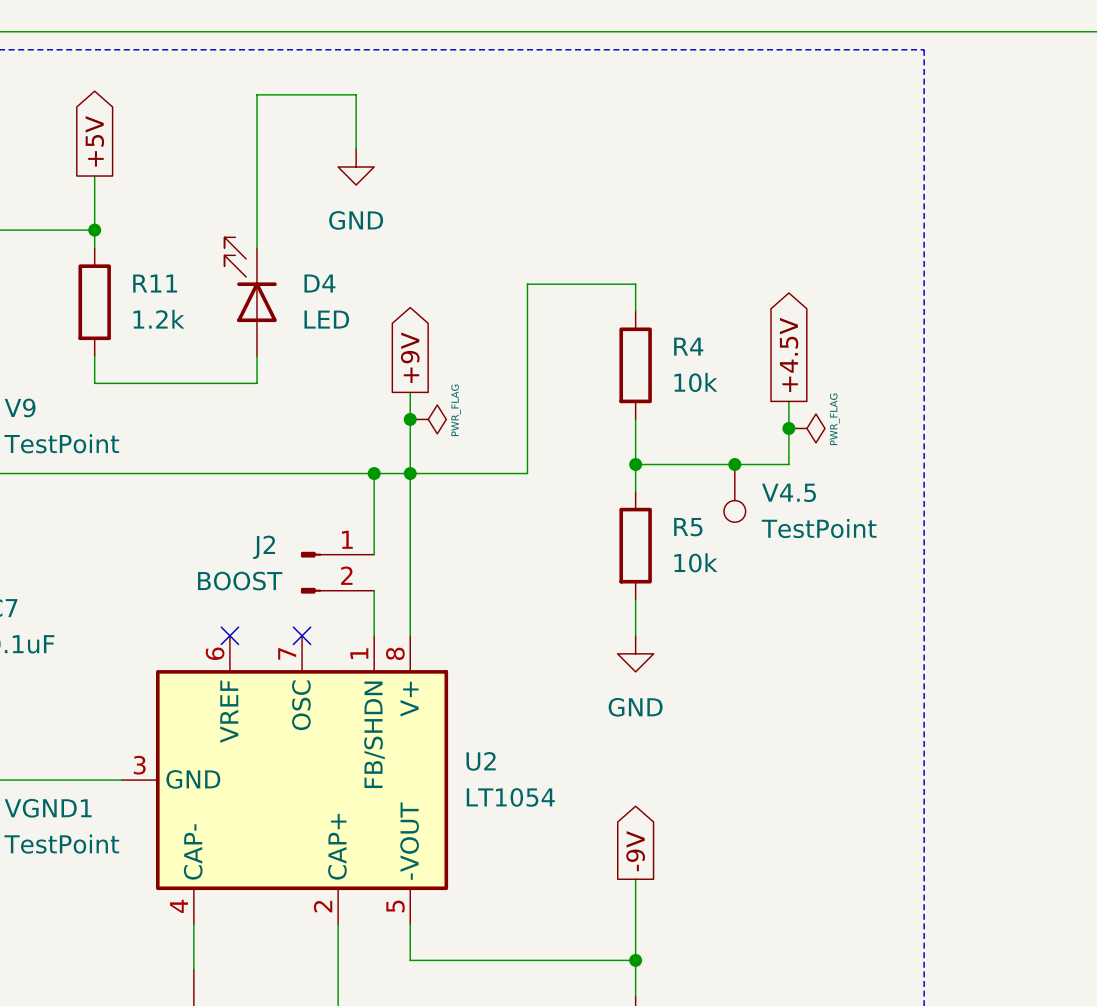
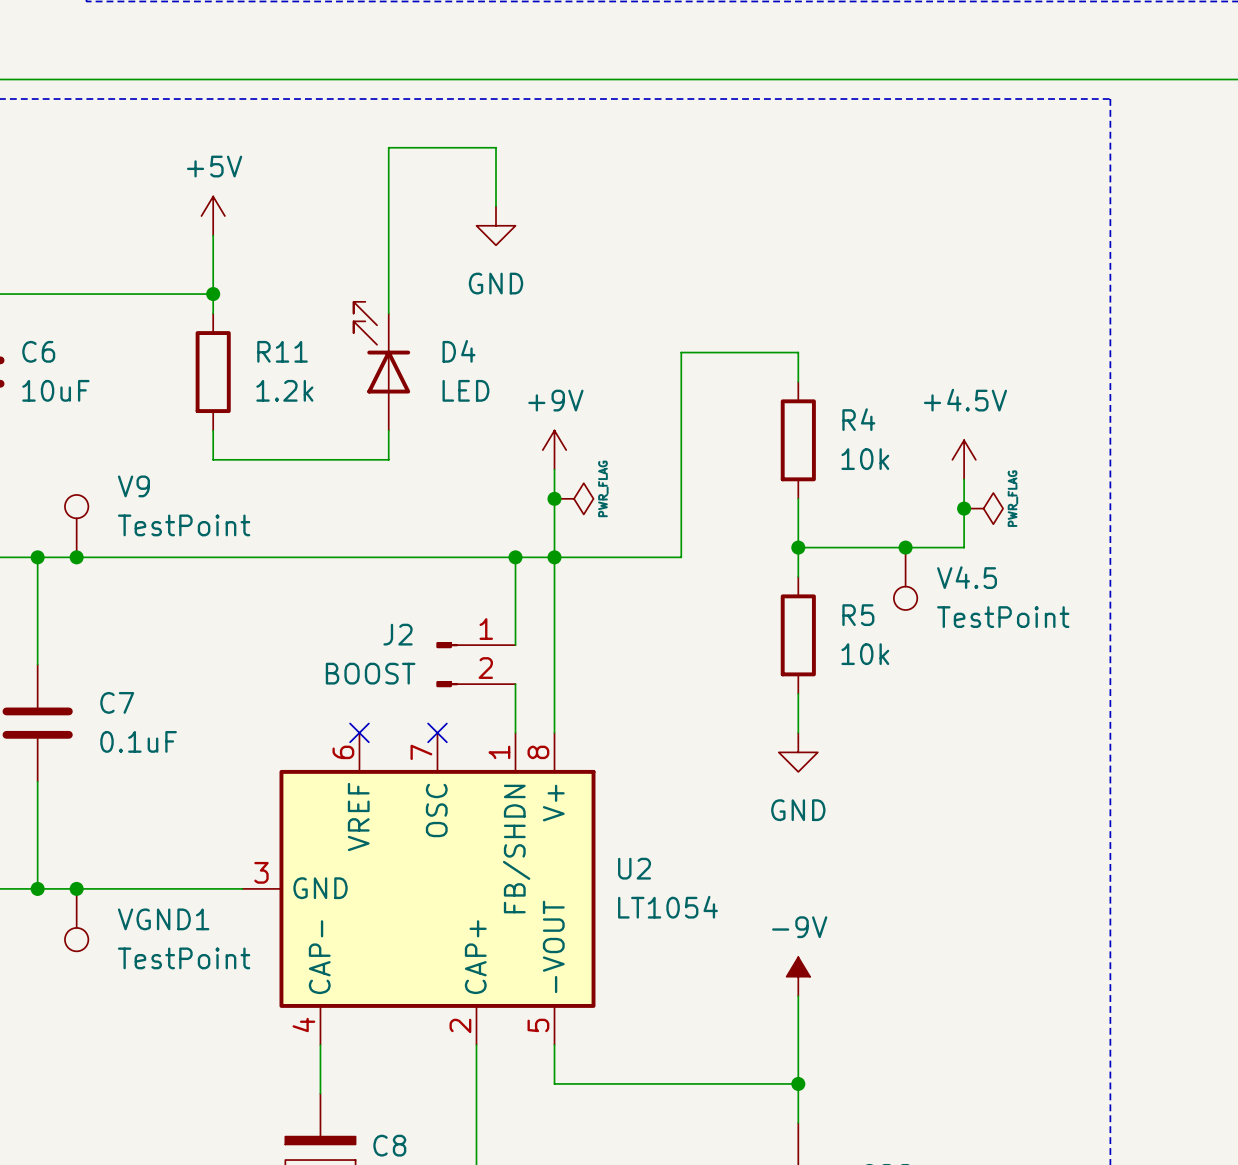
global label: +5V (94, 141) -> none
power symbol: none -> +5V (213, 216)
global label: +4.5V (789, 354) -> none
global label: +9V (410, 357) -> none
power symbol: none -> +9V (554, 450)
power symbol: none -> +4.5V (964, 459)
global label: -9V (635, 851) -> none
power symbol: none -> -9V (798, 976)

